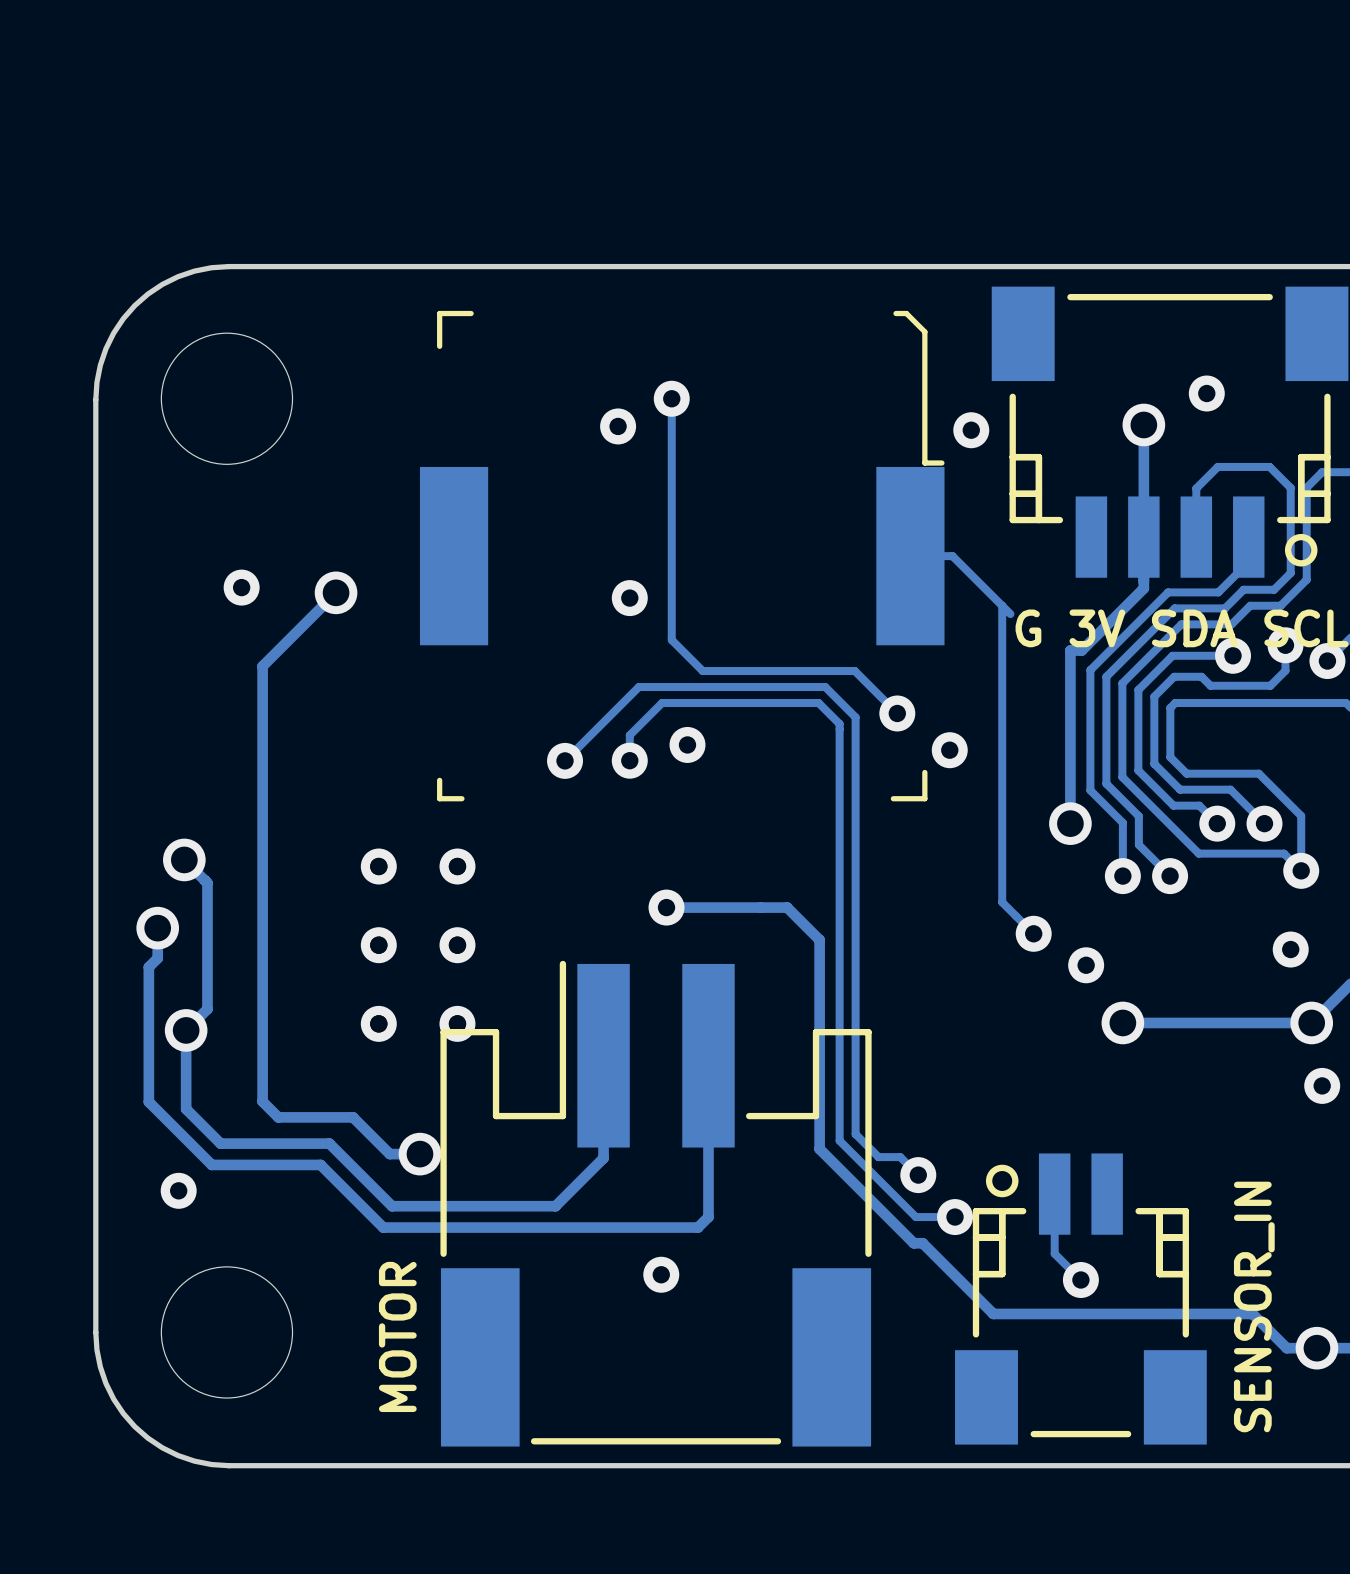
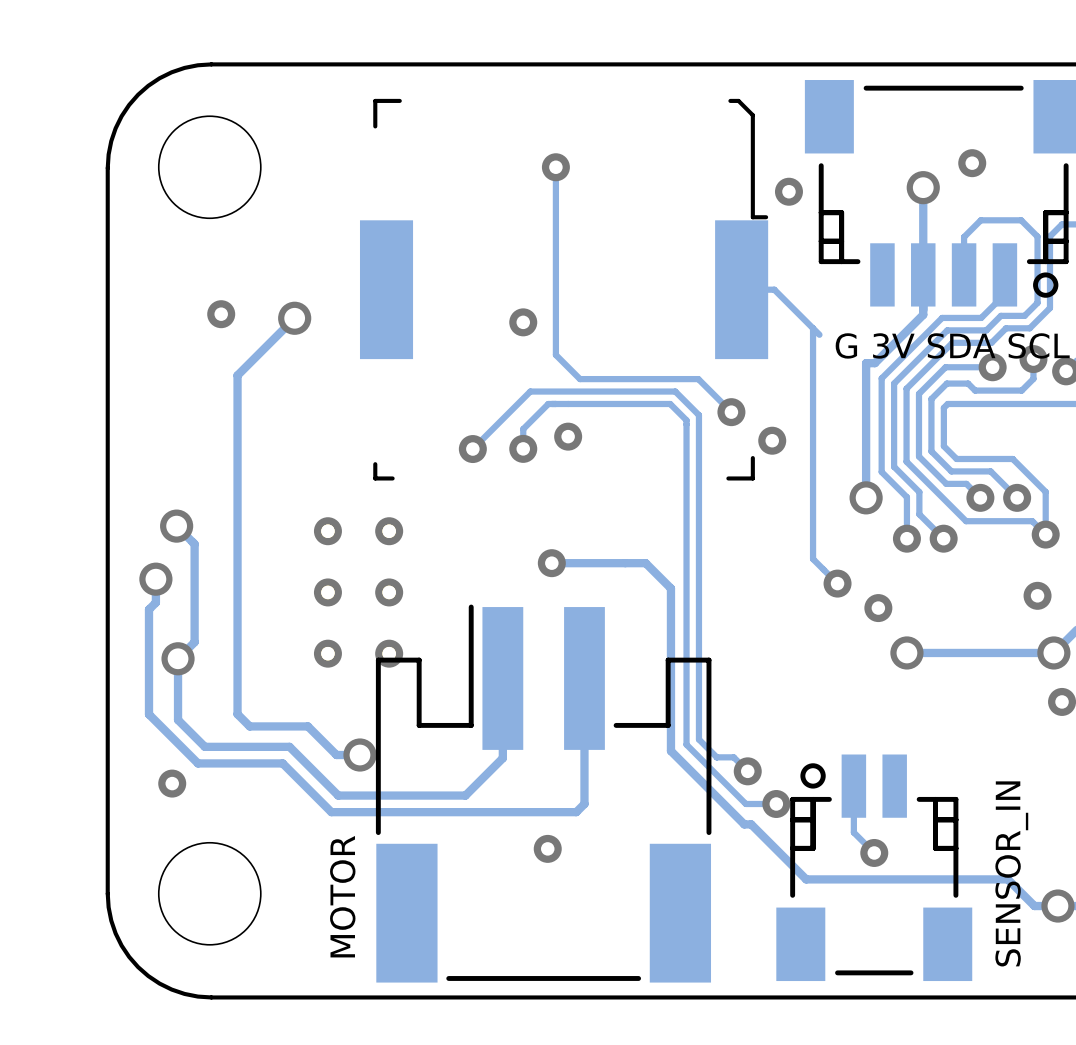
via: (618, 426) -> none

